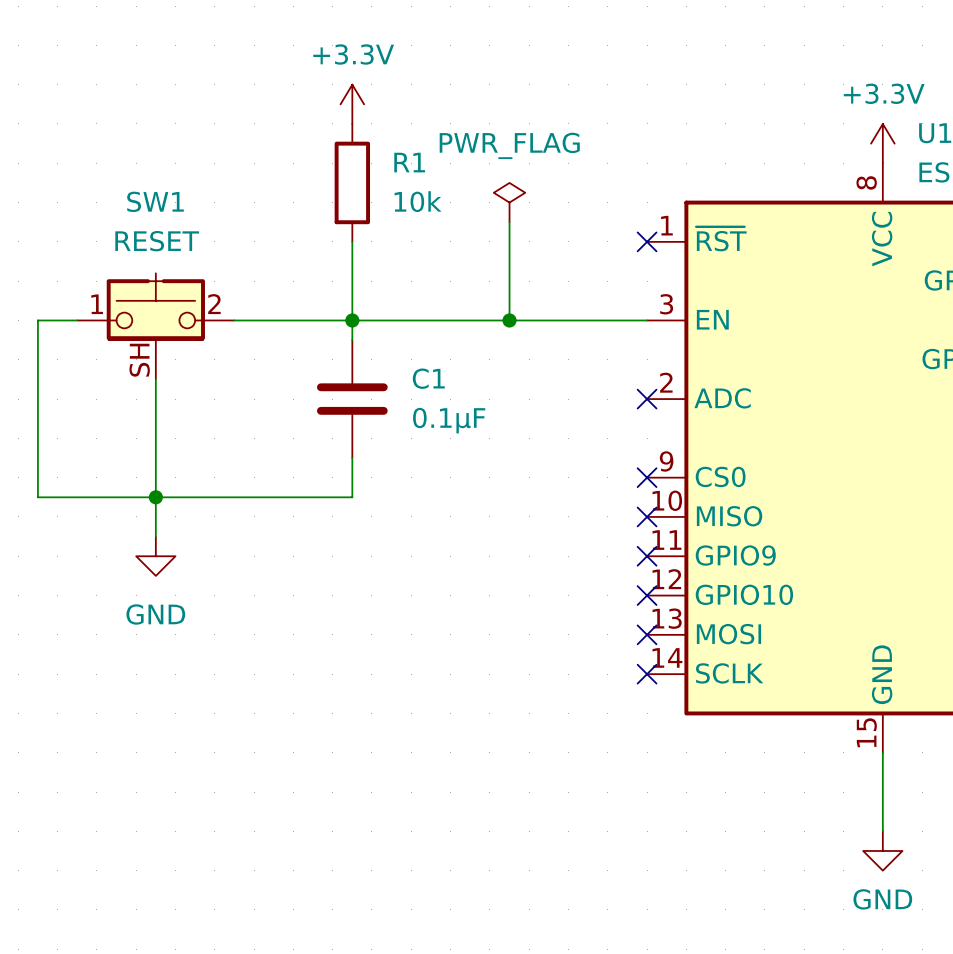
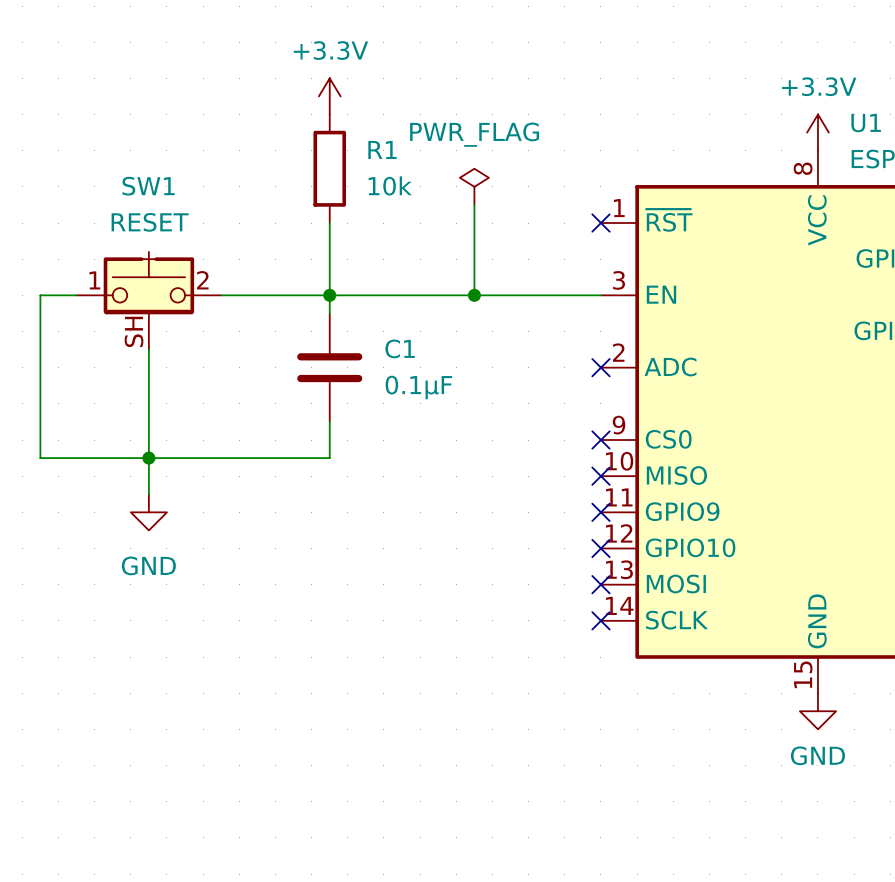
wire: (882, 752) (882, 831) -> none
power symbol position: GND (882, 850) -> GND (817, 711)

